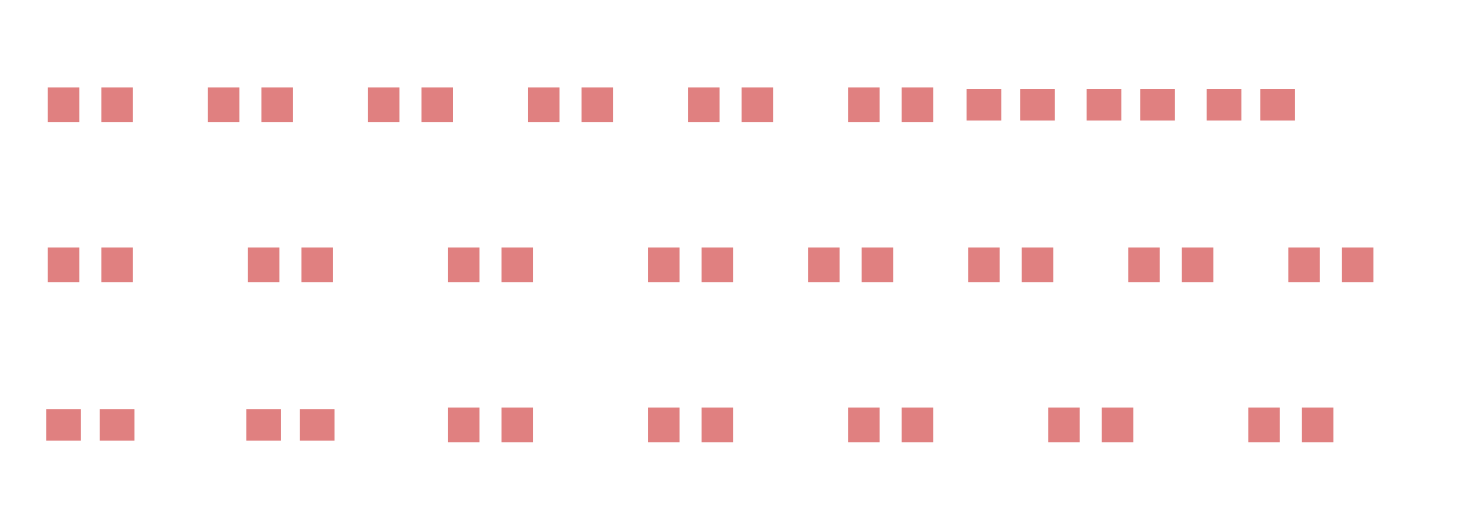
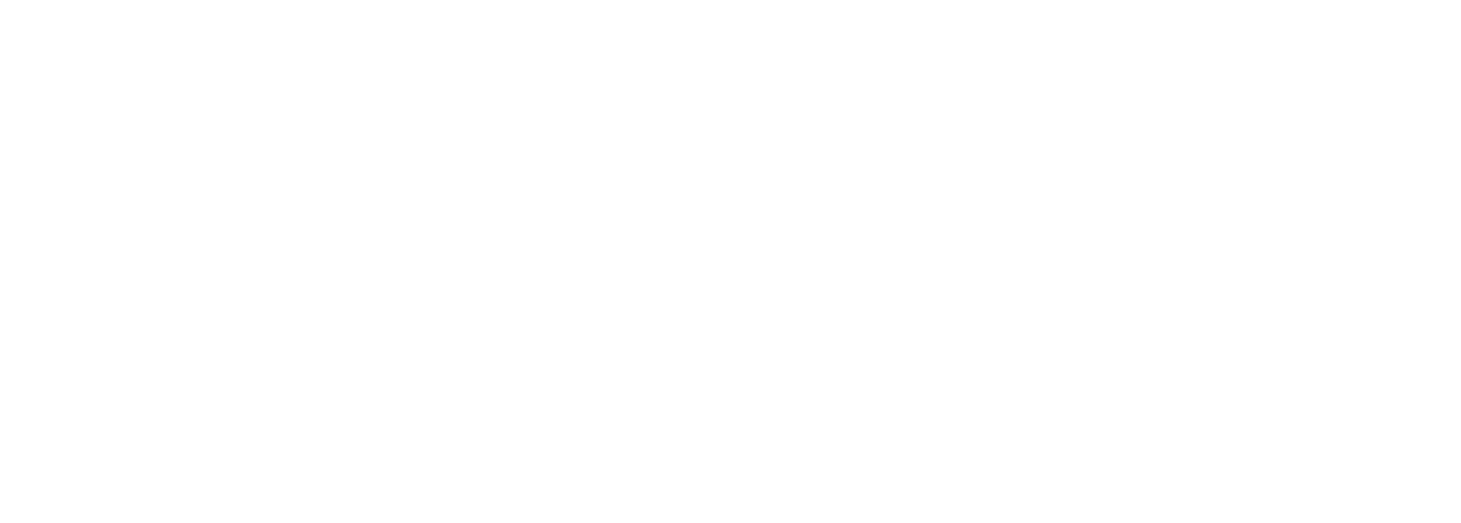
part: (90, 104) -> none
part: (250, 104) -> none
part: (410, 104) -> none
part: (570, 104) -> none
part: (730, 104) -> none
part: (890, 104) -> none
part: (1010, 104) -> none
part: (1130, 104) -> none
part: (1250, 104) -> none
part: (90, 264) -> none
part: (290, 264) -> none
part: (490, 264) -> none
part: (690, 264) -> none
part: (850, 264) -> none
part: (1010, 264) -> none
part: (1170, 264) -> none
part: (1330, 264) -> none
part: (90, 424) -> none
part: (290, 424) -> none
part: (490, 424) -> none
part: (690, 424) -> none
part: (890, 424) -> none
part: (1090, 424) -> none
part: (1290, 424) -> none

